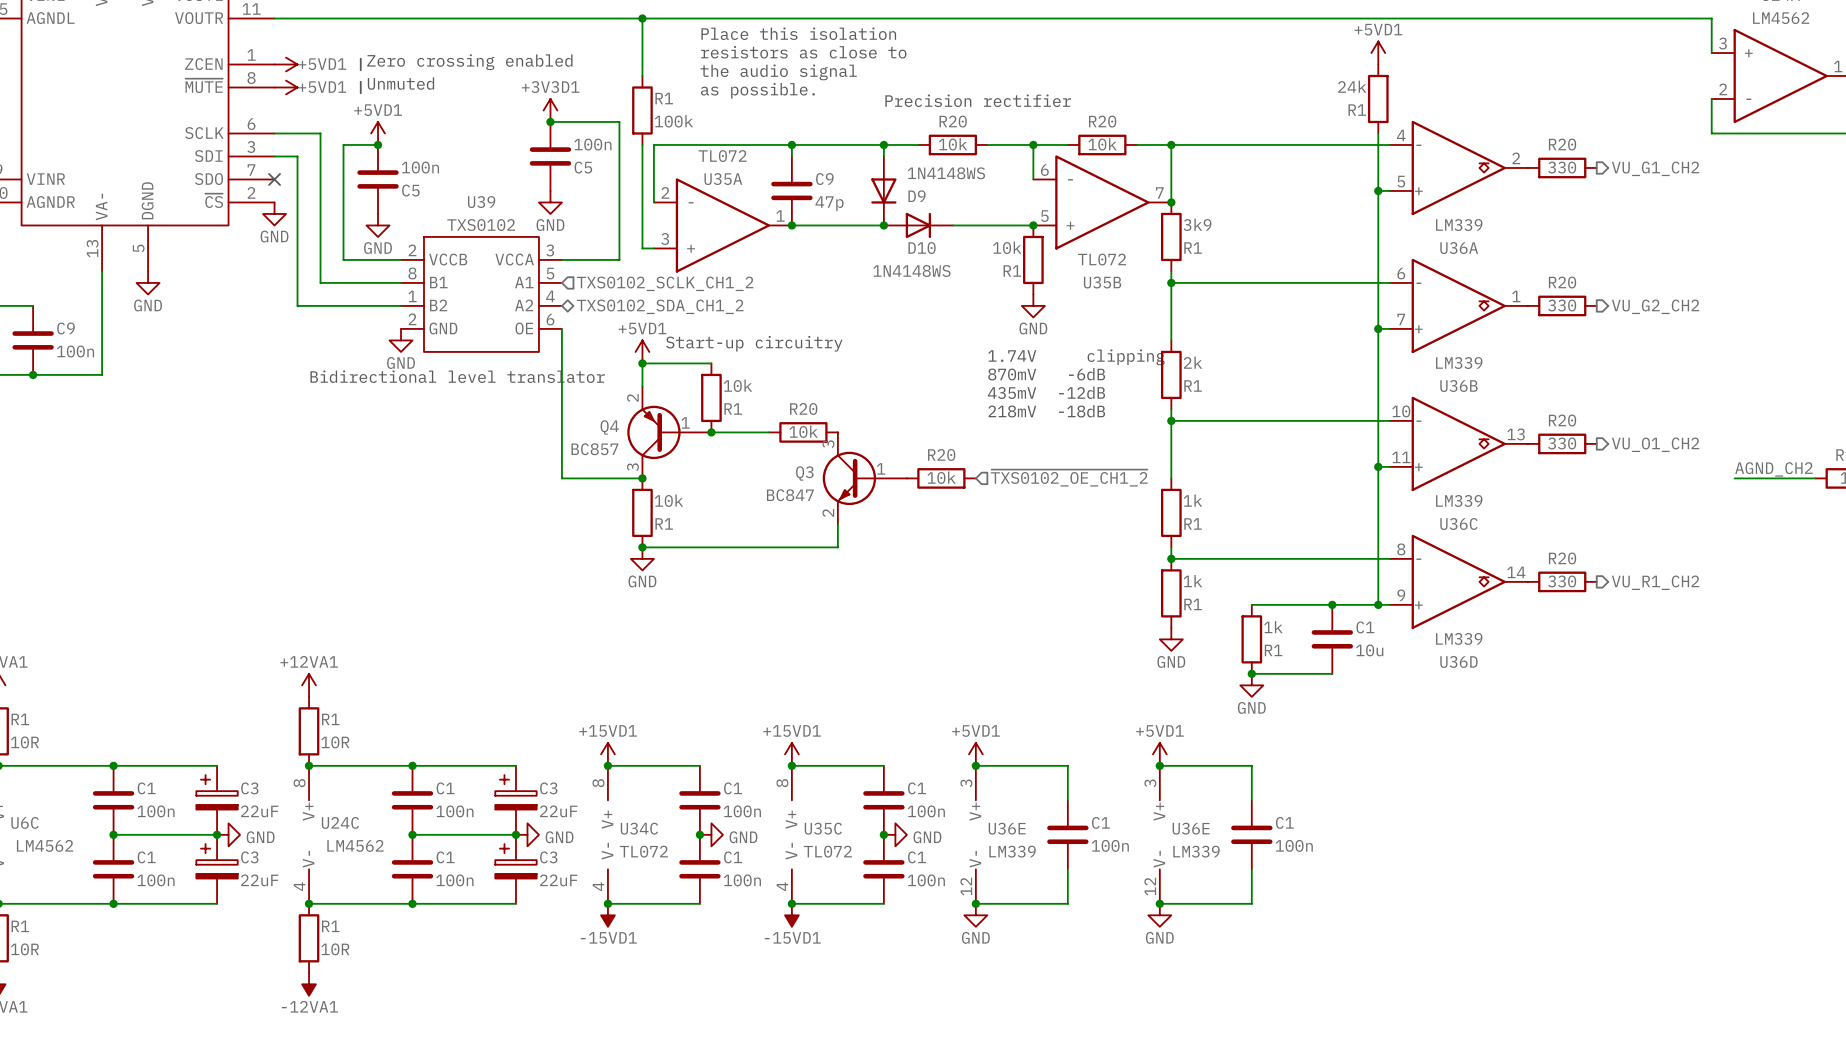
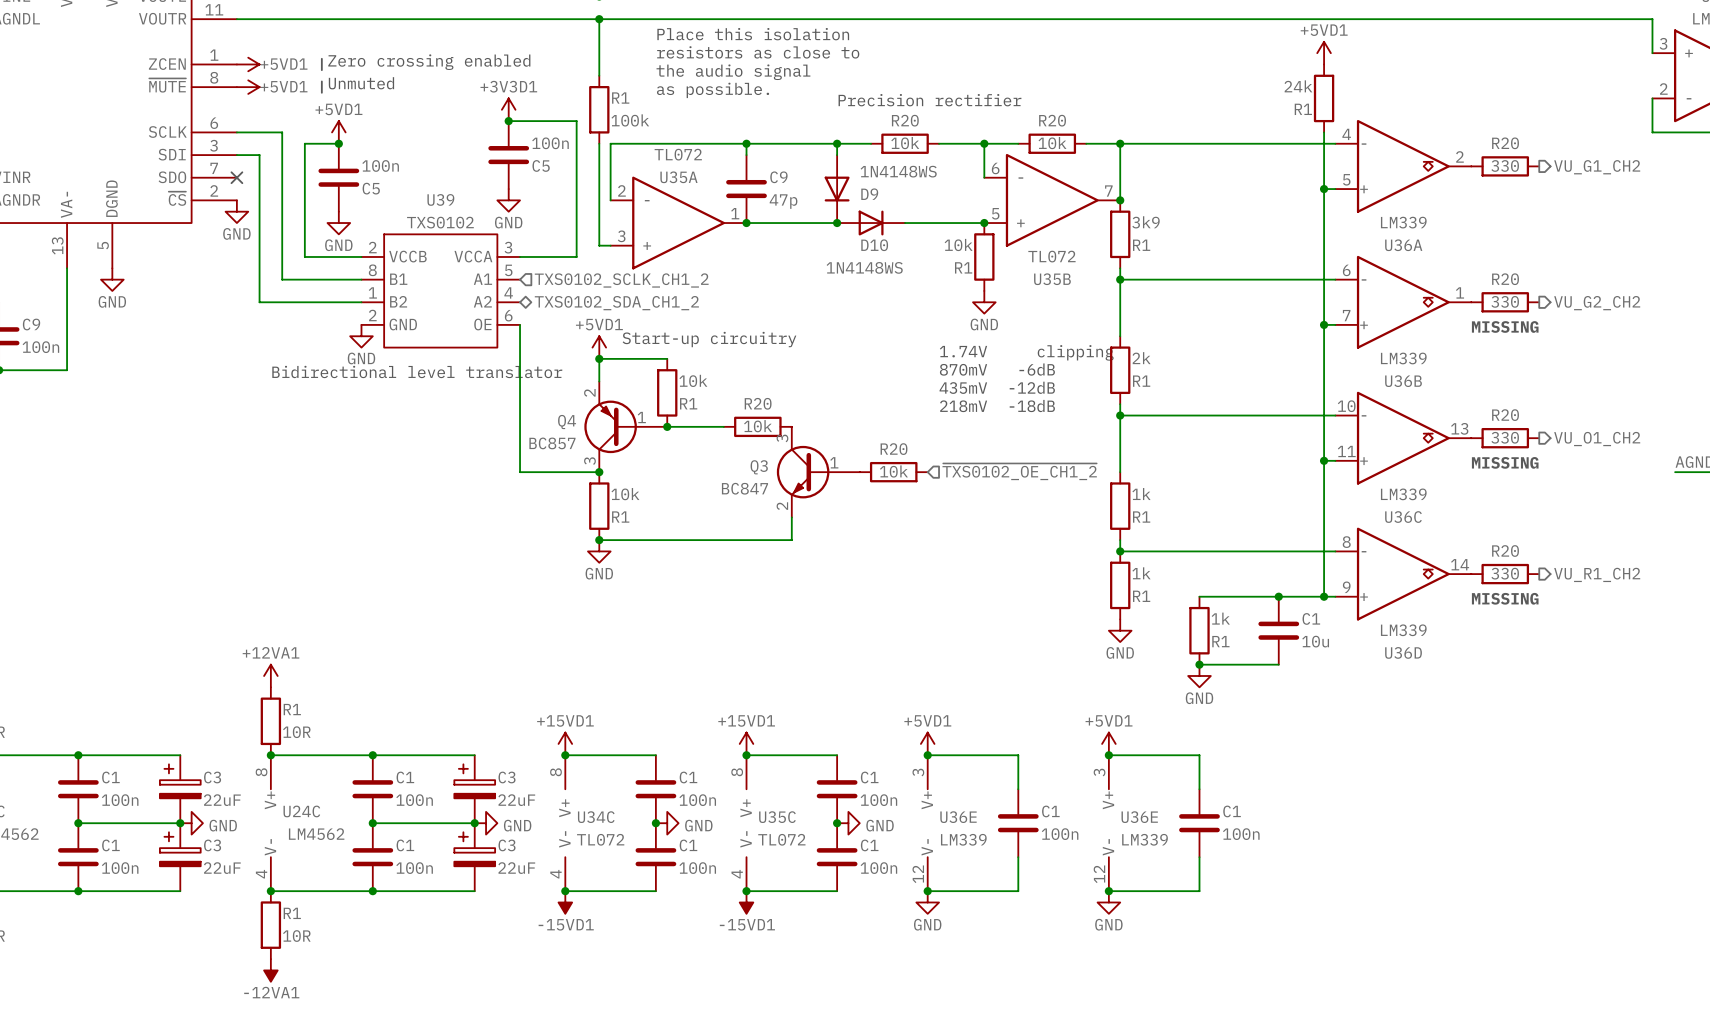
text: none -> MISSING (1505, 326)
text: none -> MISSING (1505, 462)
text: none -> MISSING (1505, 598)

